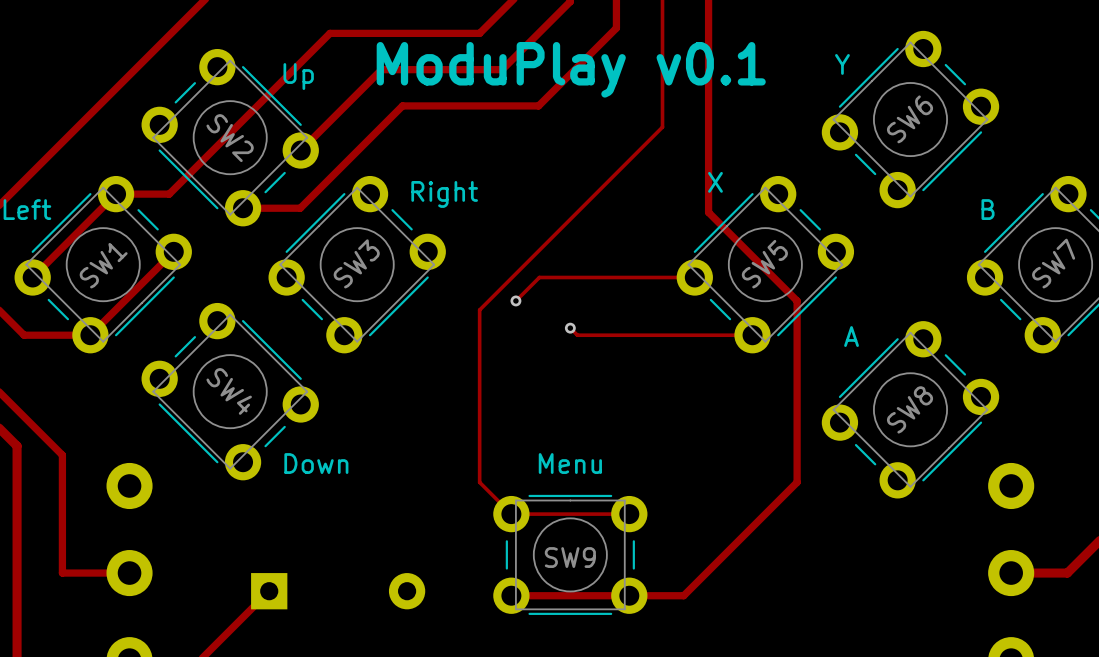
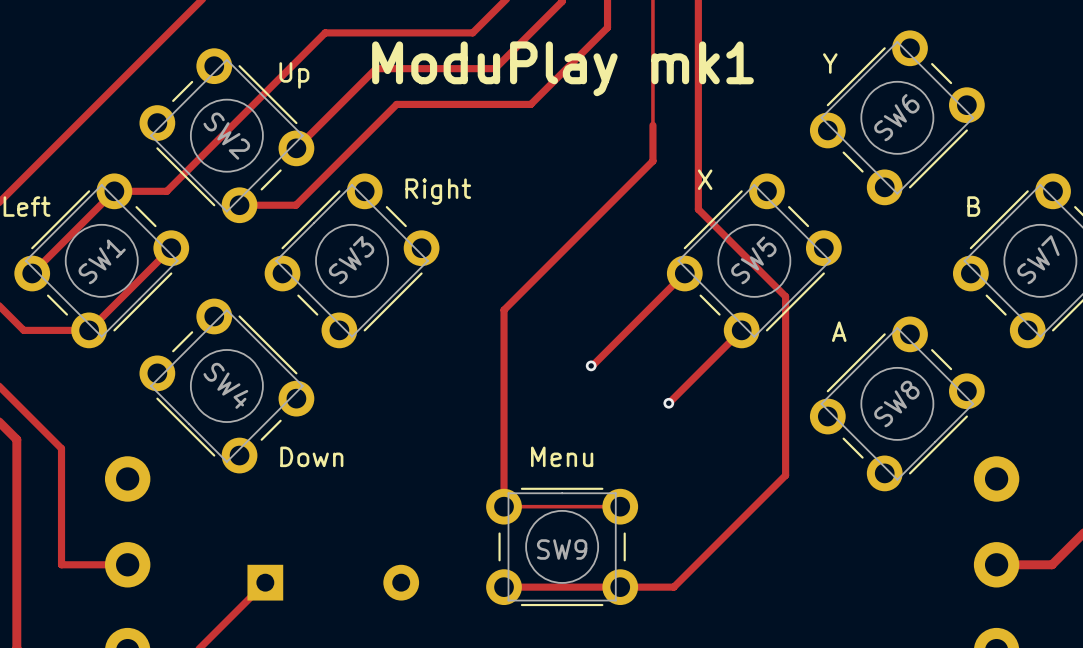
text: ModuPlay v0.1 (571, 69) -> ModuPlay mk1 (562, 68)
track: (662, 127) (479, 310) (479, 482) (511, 514) -> (652, 125) (652, 161) (504, 310) (504, 506)
track: (694, 277) (539, 277) (515, 300) -> (684, 273) (591, 365)
via: (515, 300) -> none
track: (570, 328) (577, 335) (752, 335) -> (668, 403) (741, 330)
via position: (570, 328) -> (591, 365)
via: none -> (668, 403)

